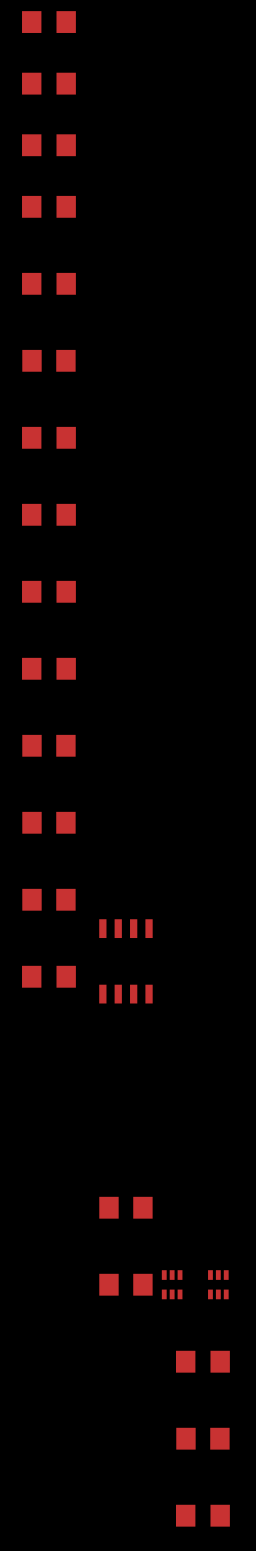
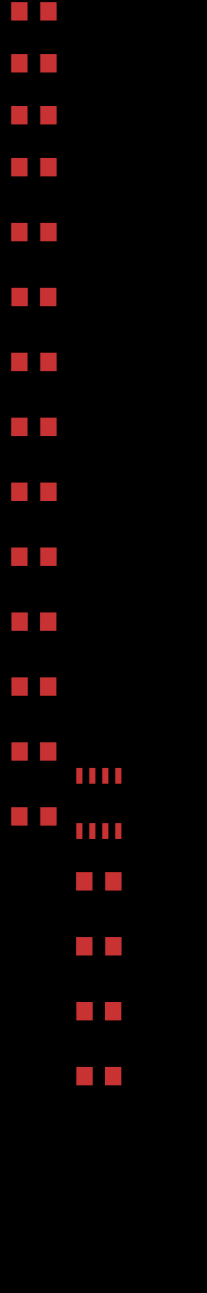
part: none -> (98, 881)
part: none -> (98, 946)
part: (172, 1284) -> none
part: (218, 1284) -> none
part: (202, 1361) -> none
part: (202, 1438) -> none
part: (202, 1515) -> none

